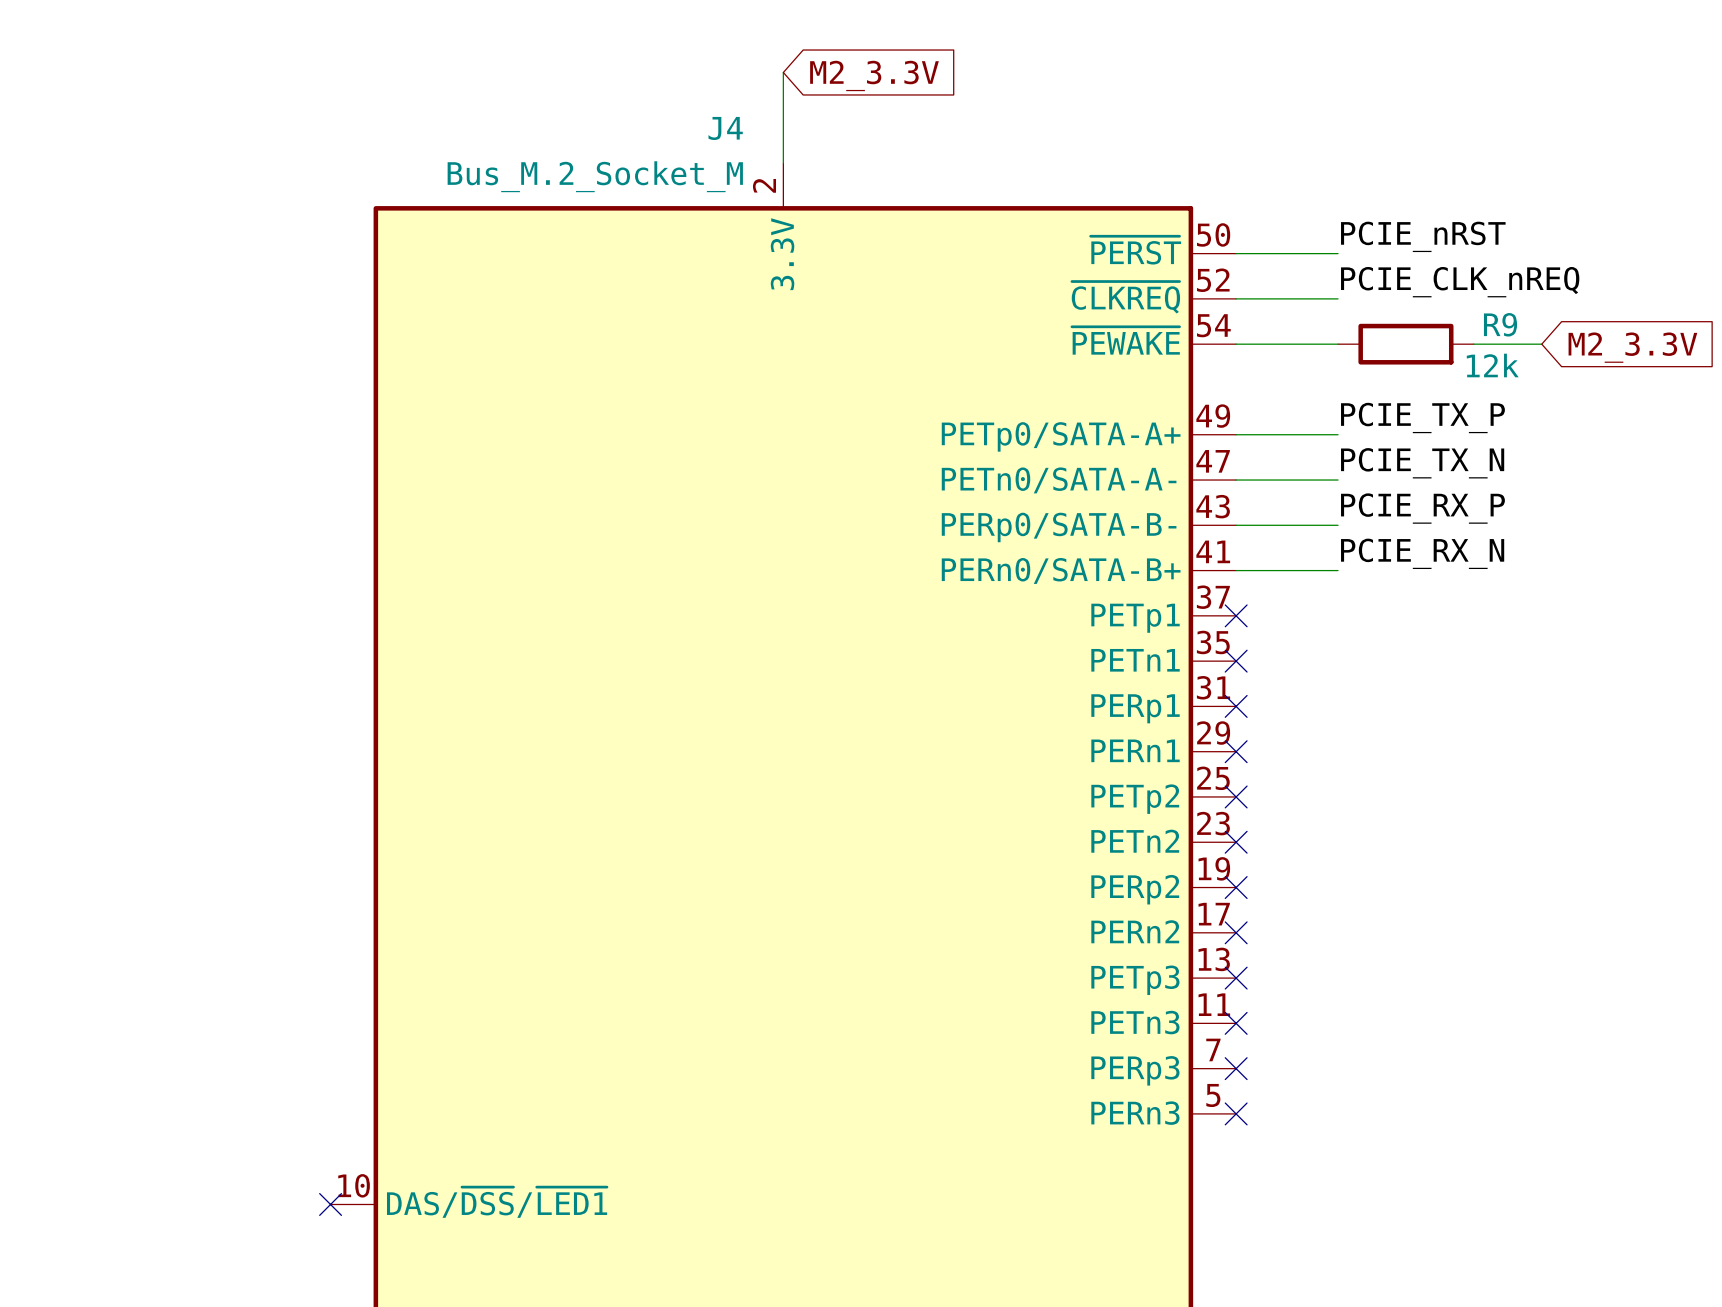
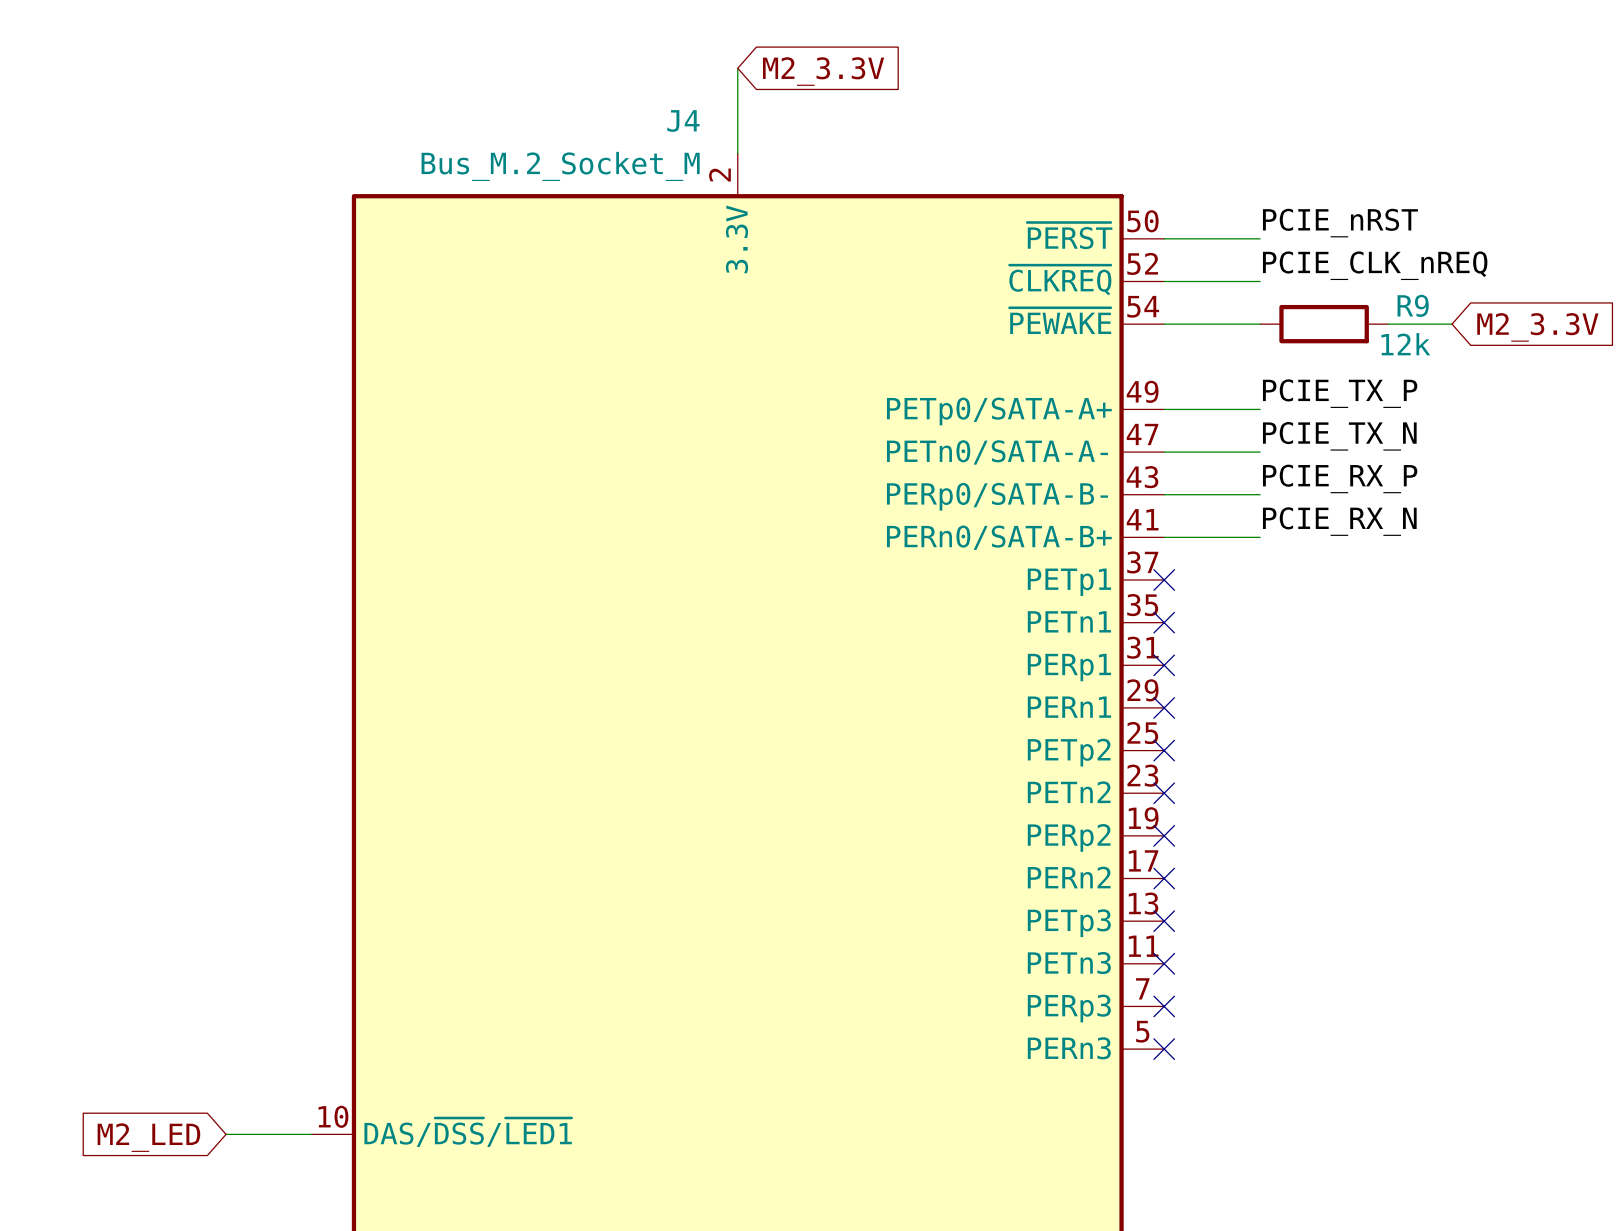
wire: none -> (226, 1134) (311, 1134)
no-connect mark: (330, 1204) -> none
global label: none -> M2_LED (148, 1137)

